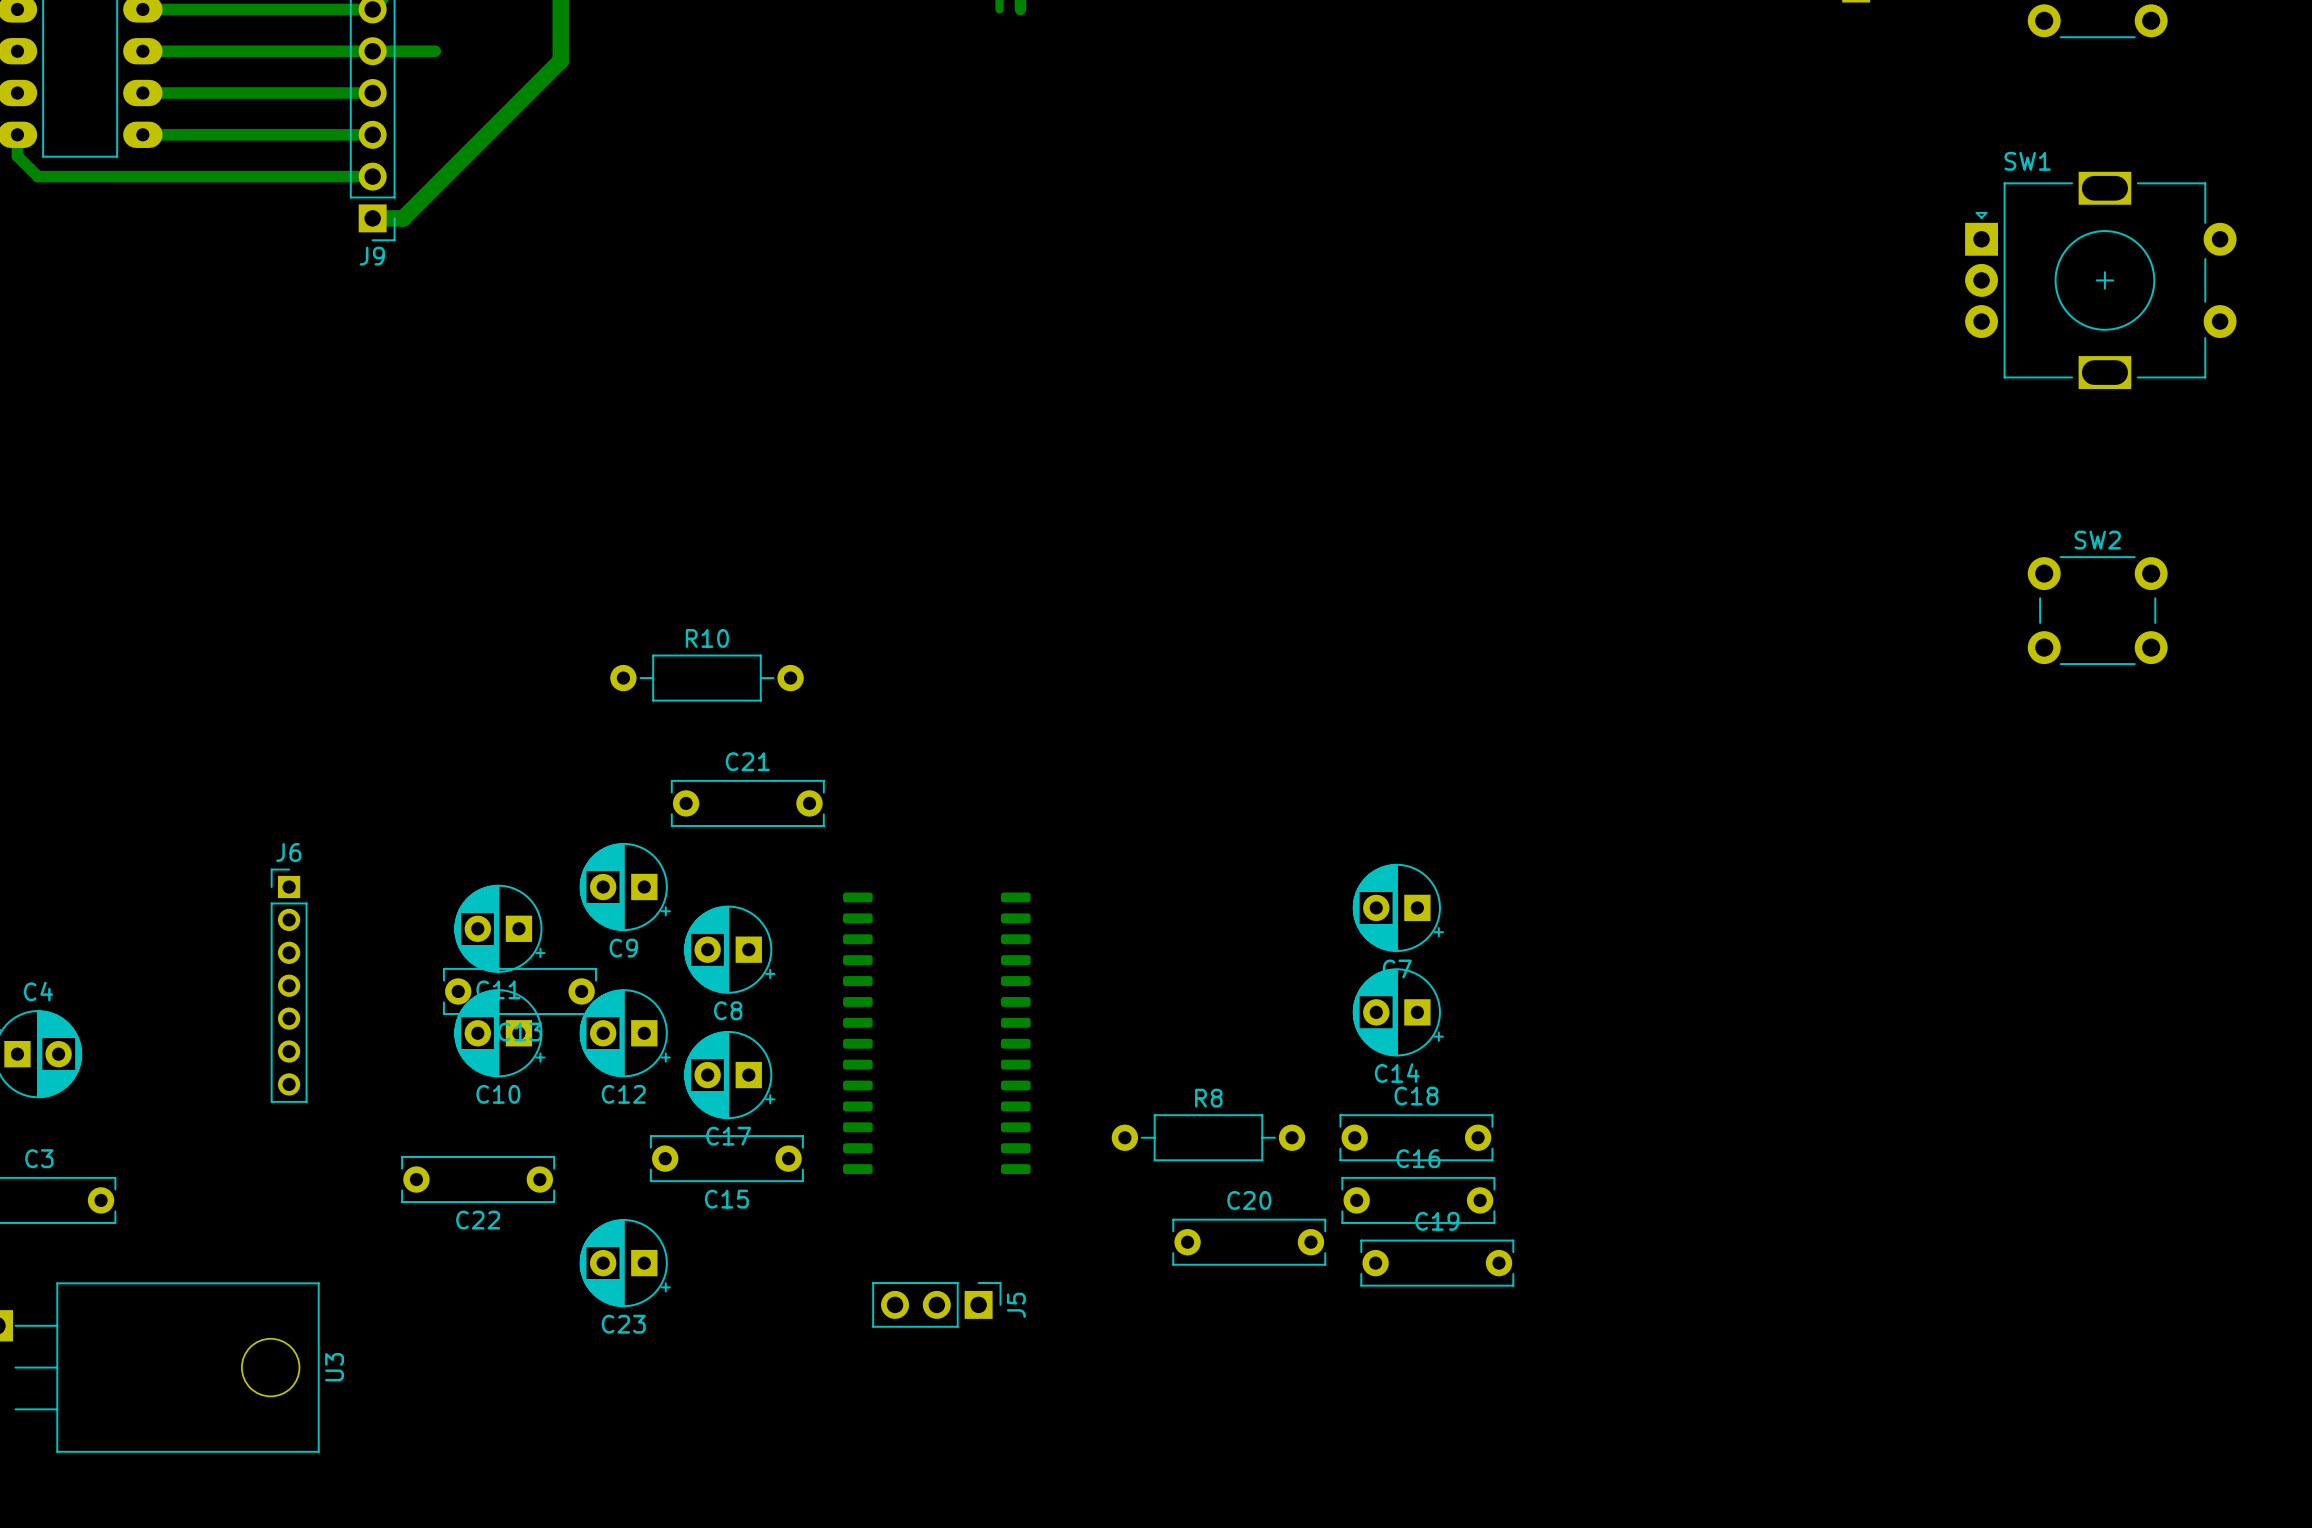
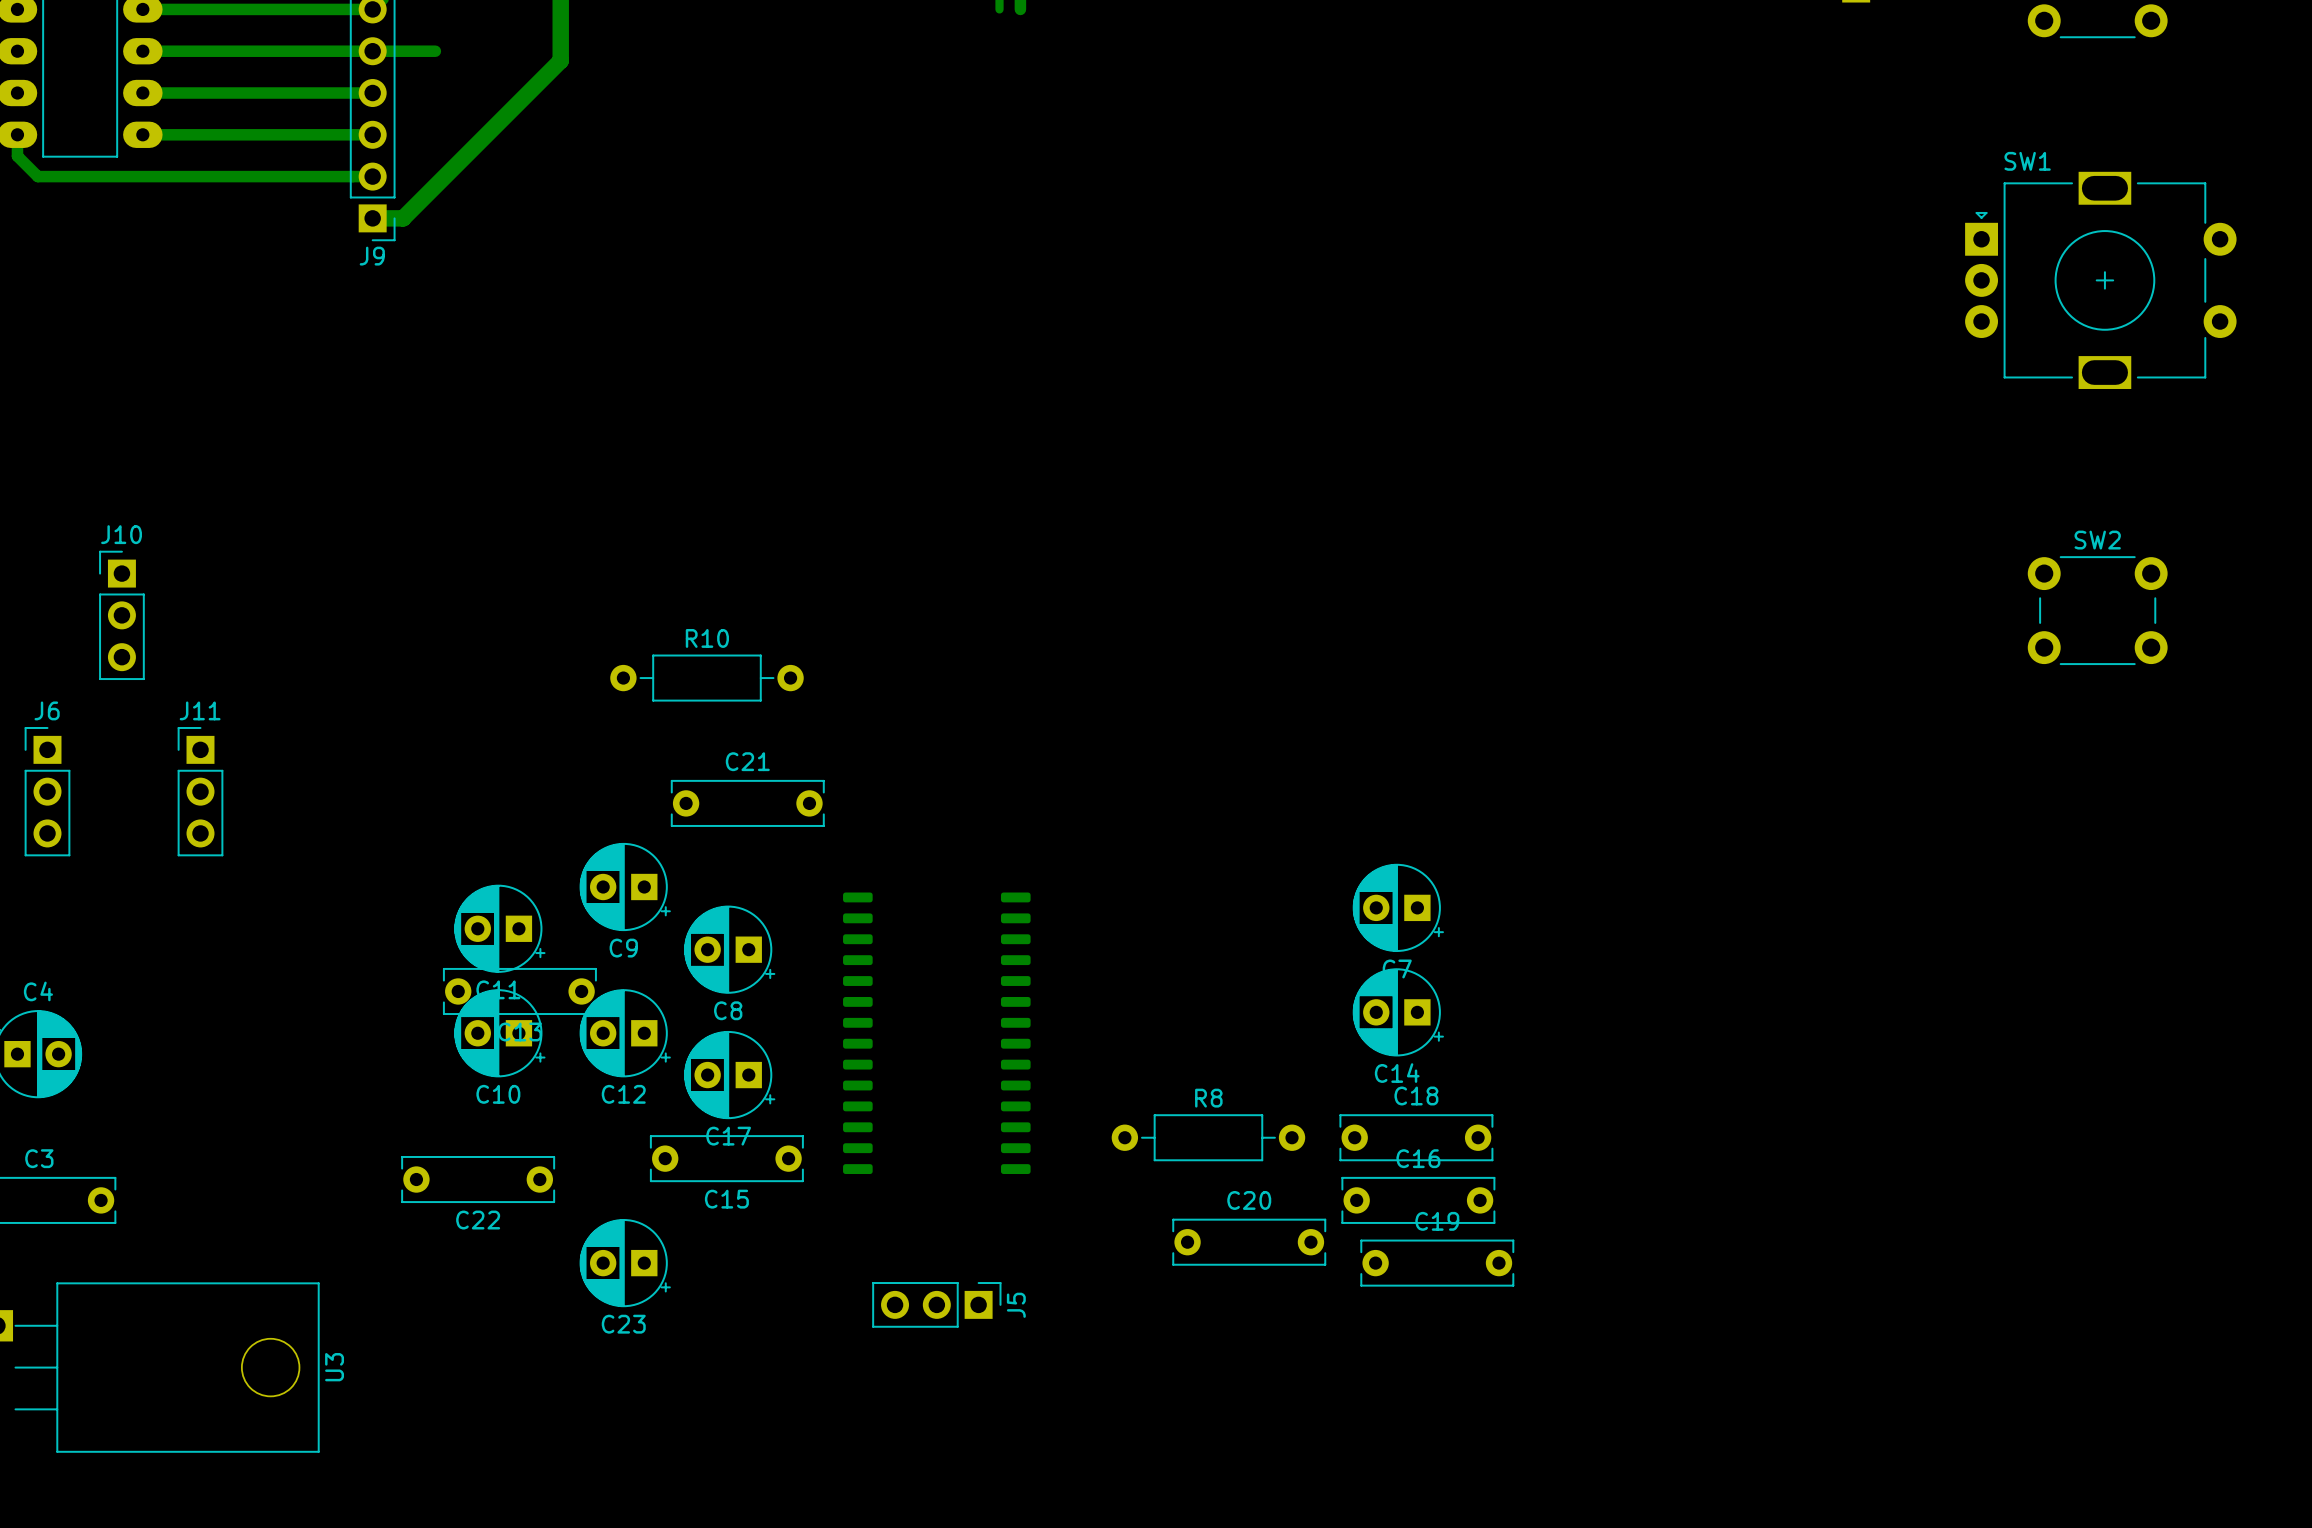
J10: none -> (121, 615)
J11: none -> (200, 791)
J6 name position: J6 (288, 852) -> J6 (47, 710)
J6 footprint: [270, 868, 308, 1103] -> [24, 727, 71, 857]

